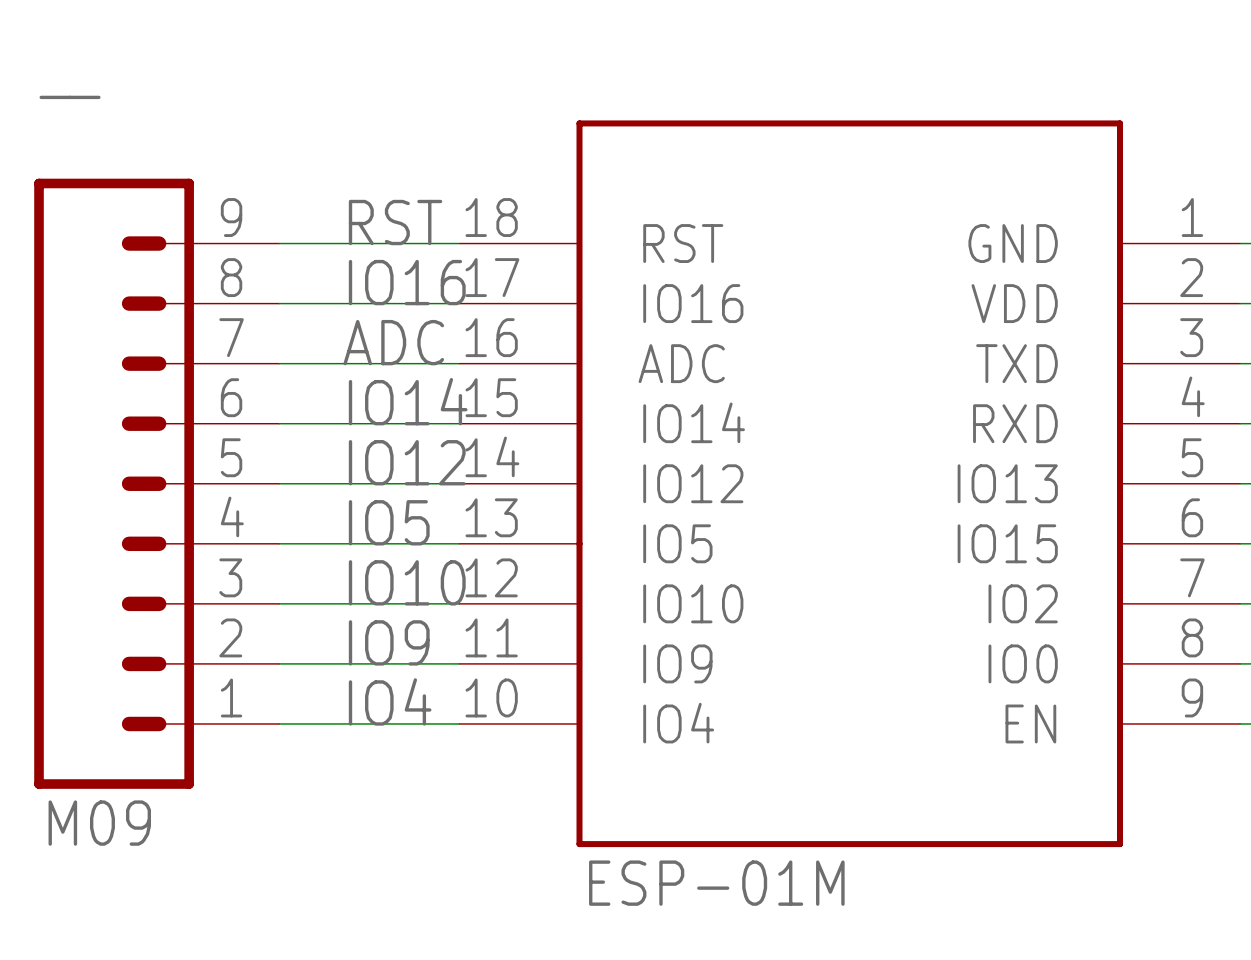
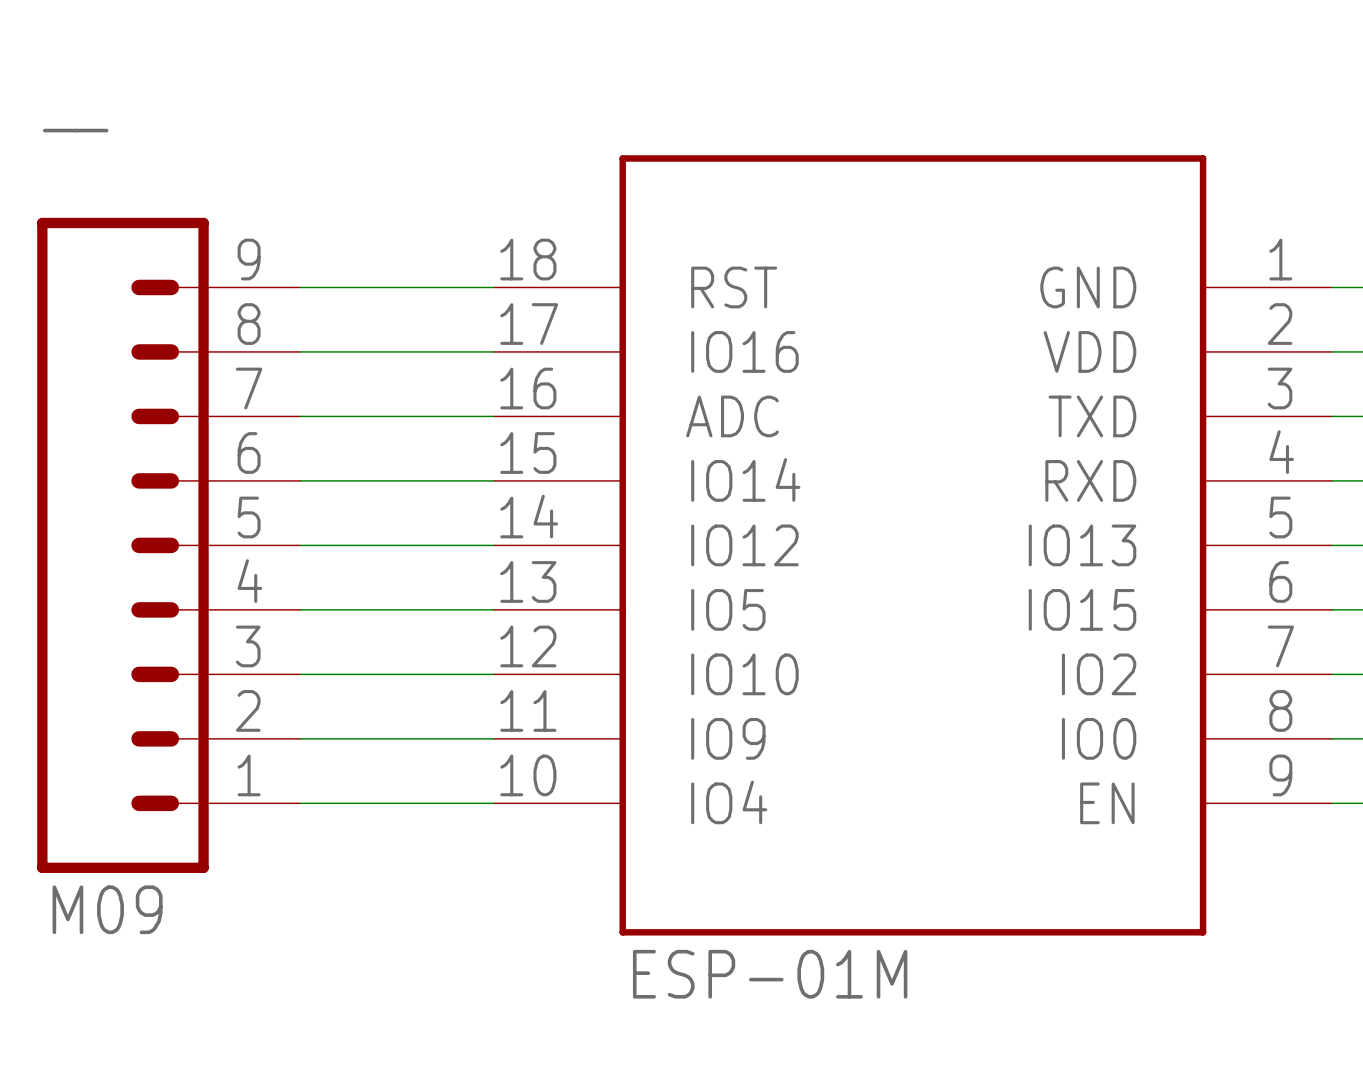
label: RST (395, 222) -> none
label: IO16 (407, 282) -> none
label: ADC (393, 342) -> none
label: IO14 (408, 401) -> none
label: IO12 (407, 462) -> none
label: IO5 (389, 522) -> none
label: IO10 (407, 582) -> none
label: IO9 (389, 642) -> none
label: IO4 (390, 701) -> none

